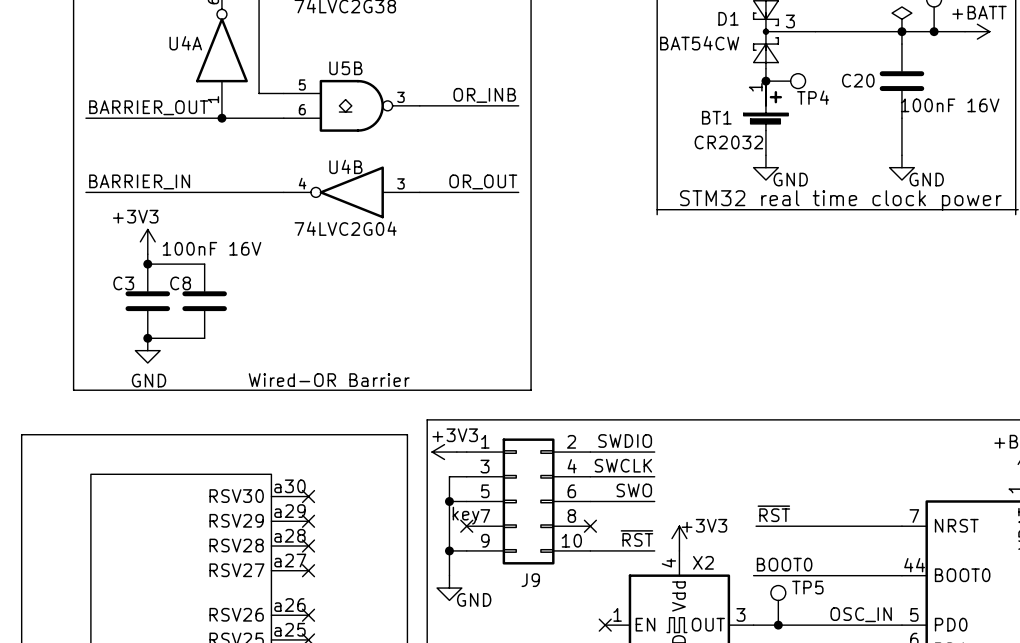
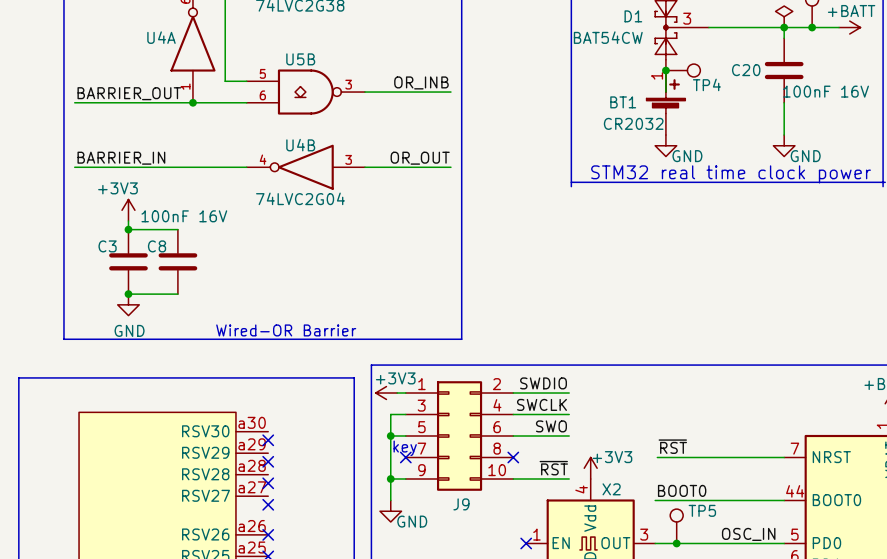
no-connect mark: (308, 496) -> none
no-connect mark: none -> (268, 440)
no-connect mark: (308, 521) -> none
no-connect mark: none -> (268, 461)
no-connect mark: (308, 546) -> none
no-connect mark: none -> (268, 483)
no-connect mark: (308, 570) -> none
no-connect mark: none -> (268, 504)

